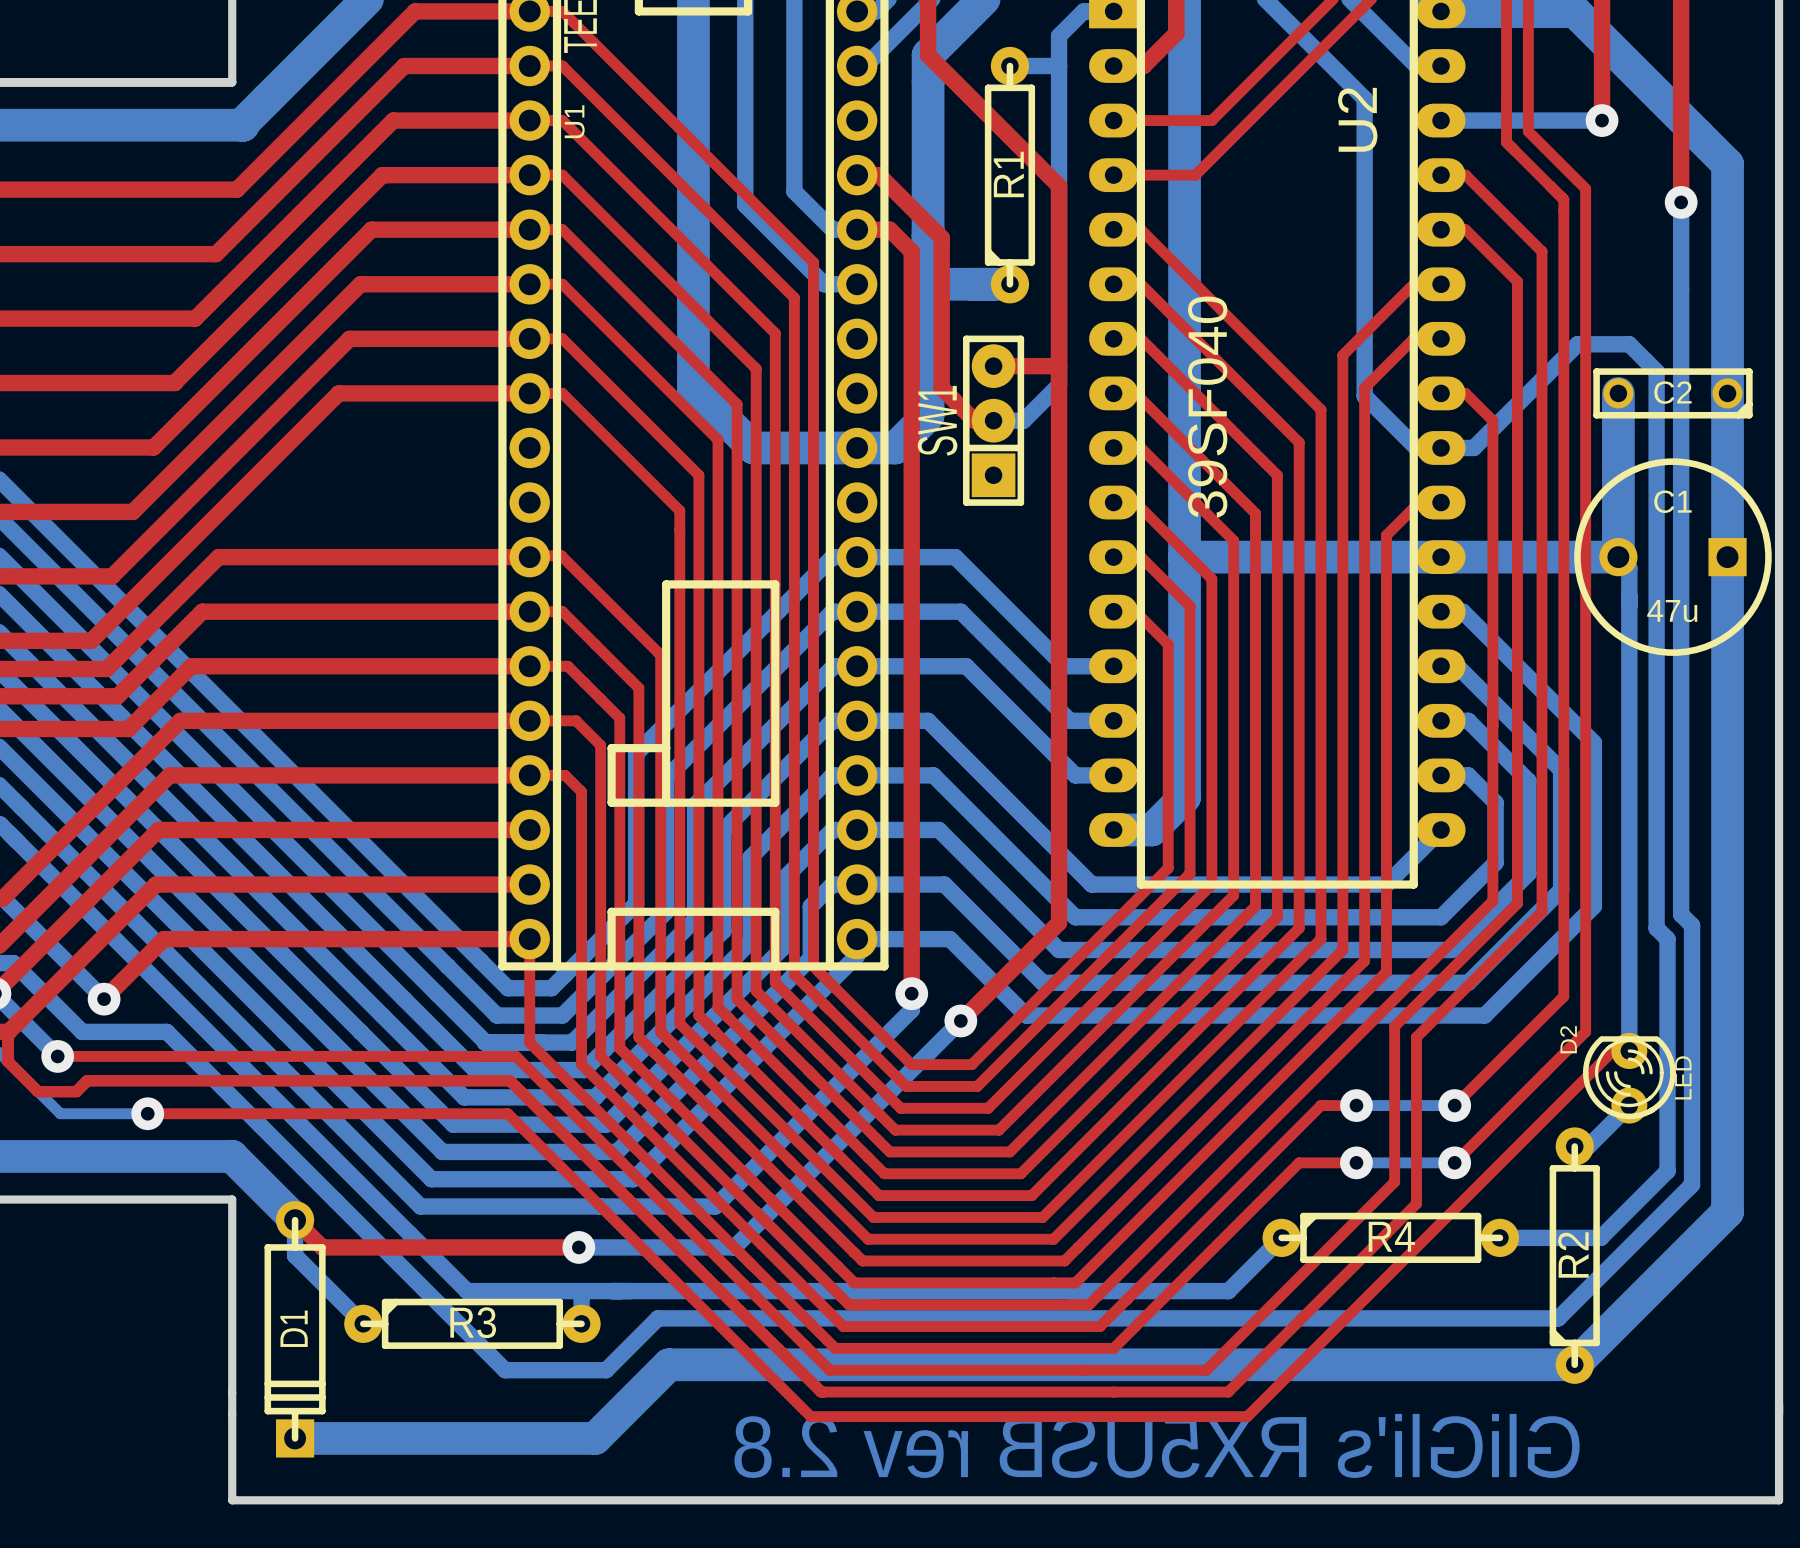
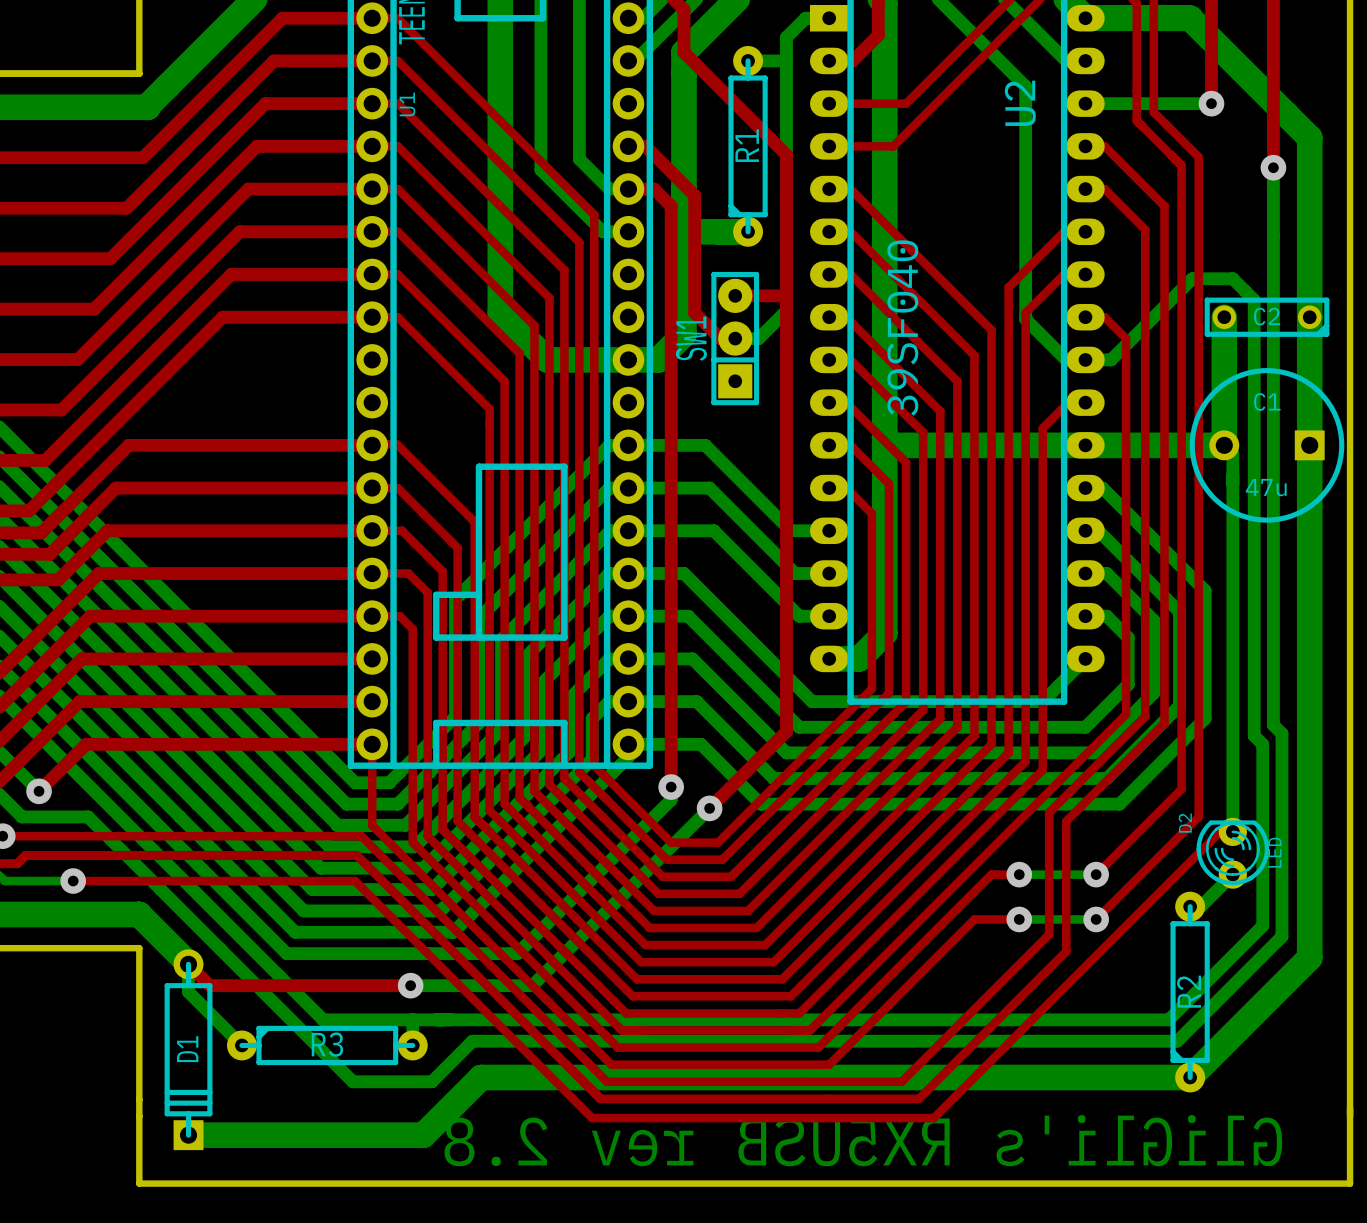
bottom track: (1281, 1237) (1228, 1291) -> none
R4: (1390, 1237) -> none
bottom track: (1499, 1237) (1600, 1237) -> (919, 1019) (1168, 1019) (1210, 978)

